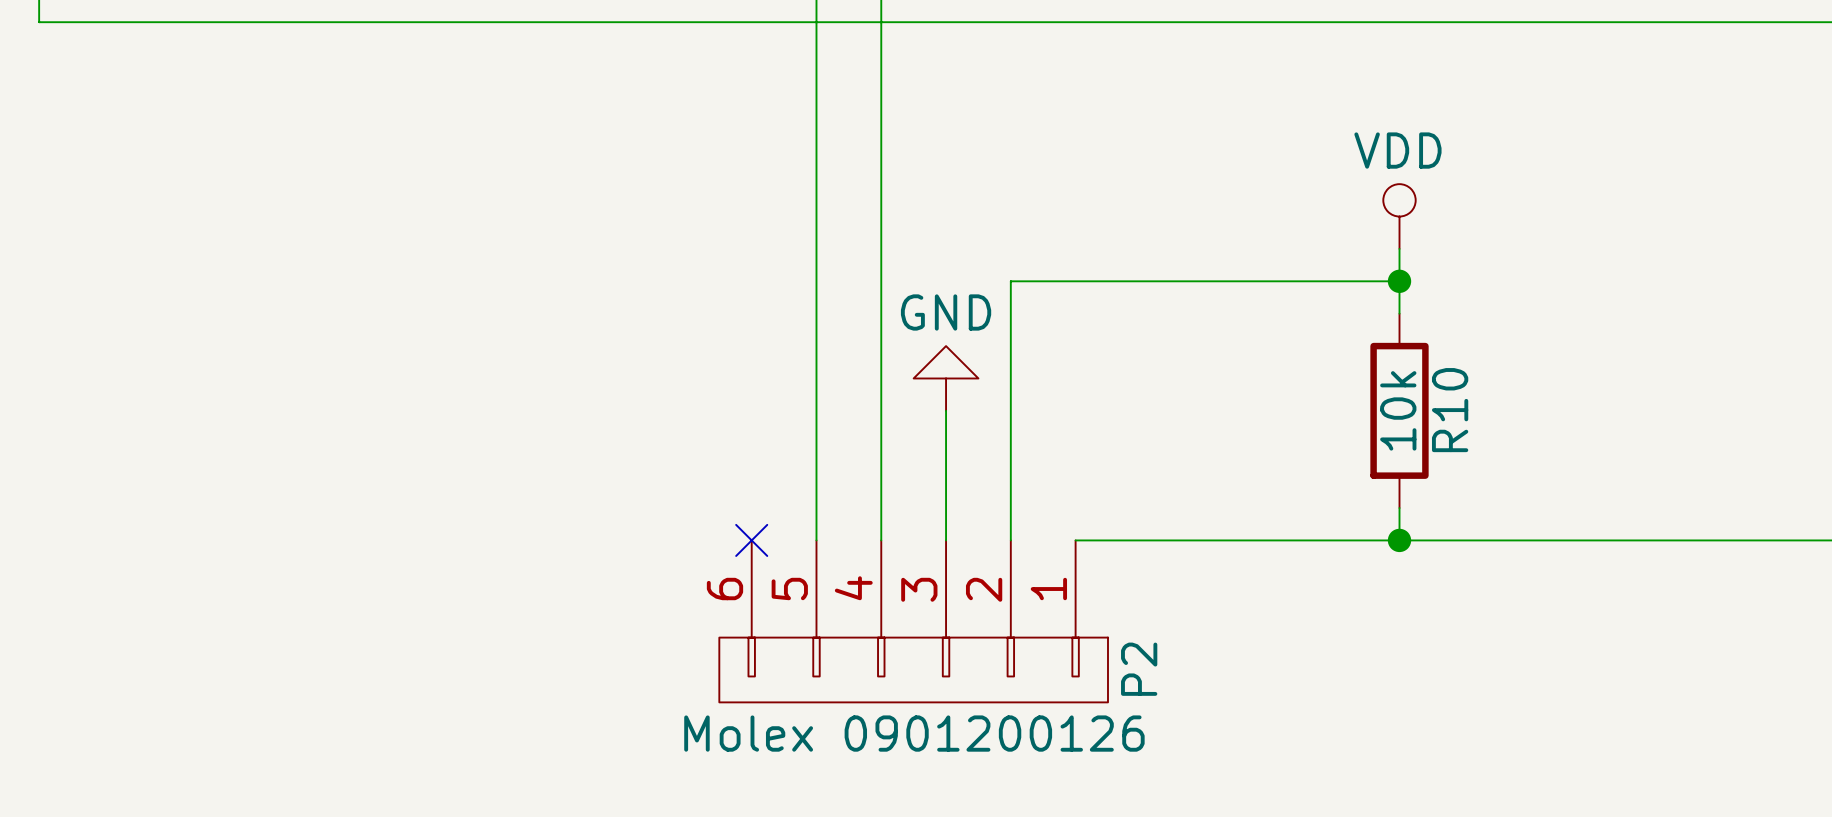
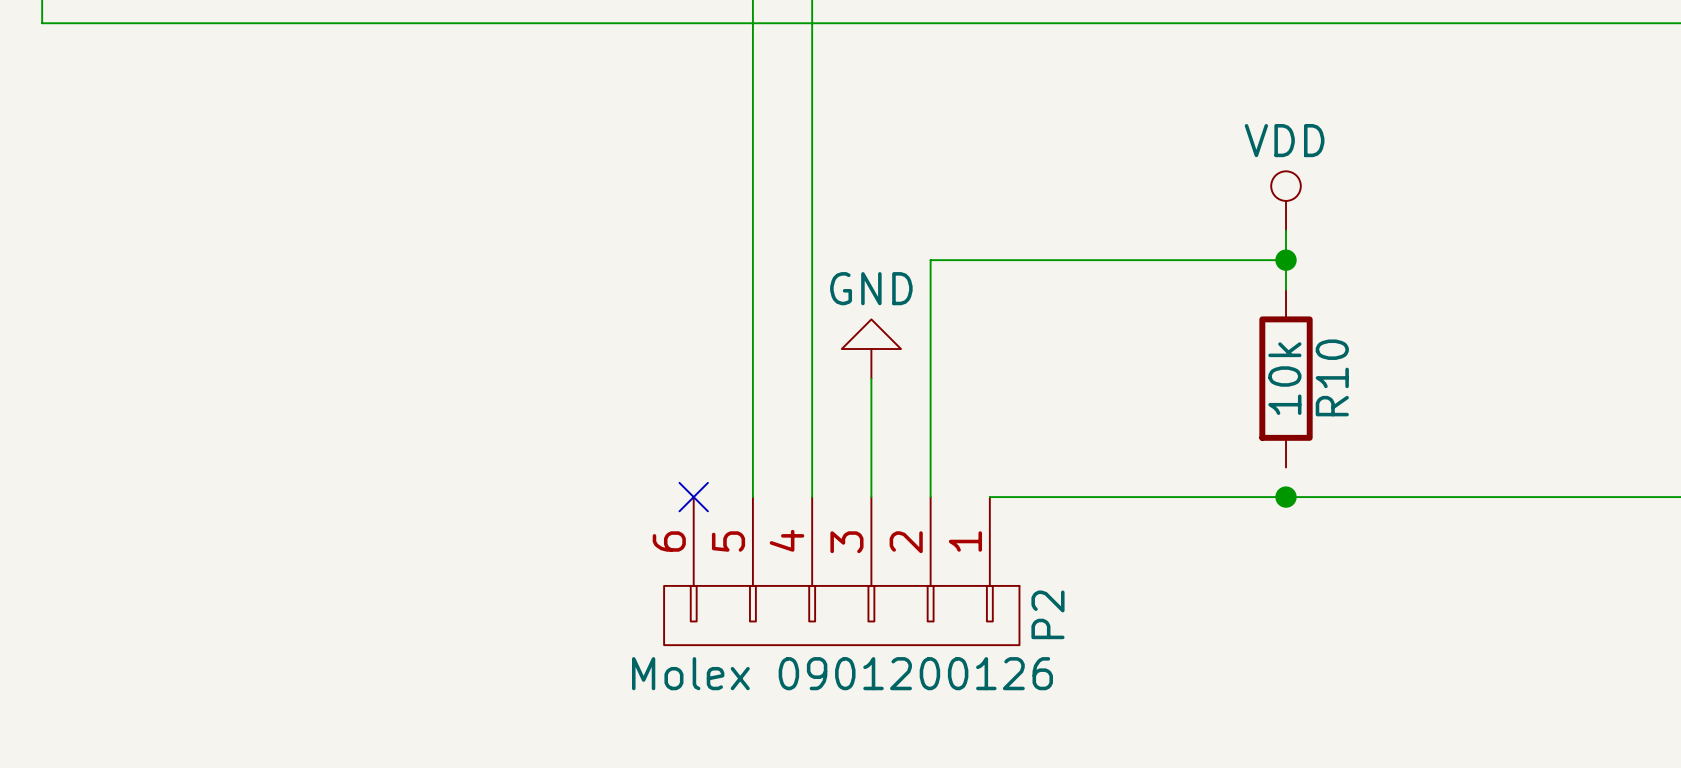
wire: (1399, 508) (1399, 540) -> none

